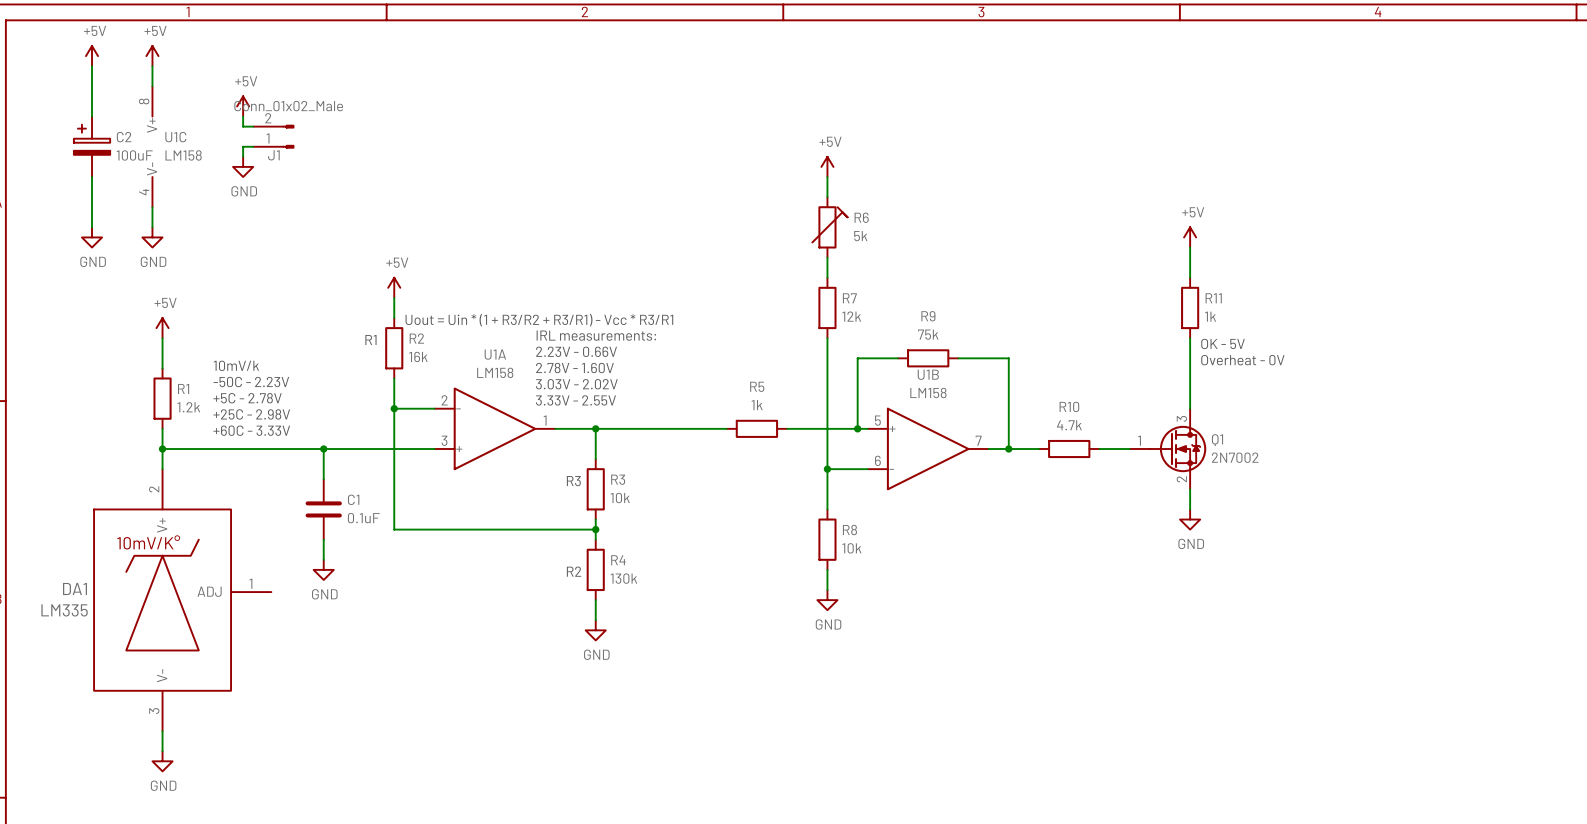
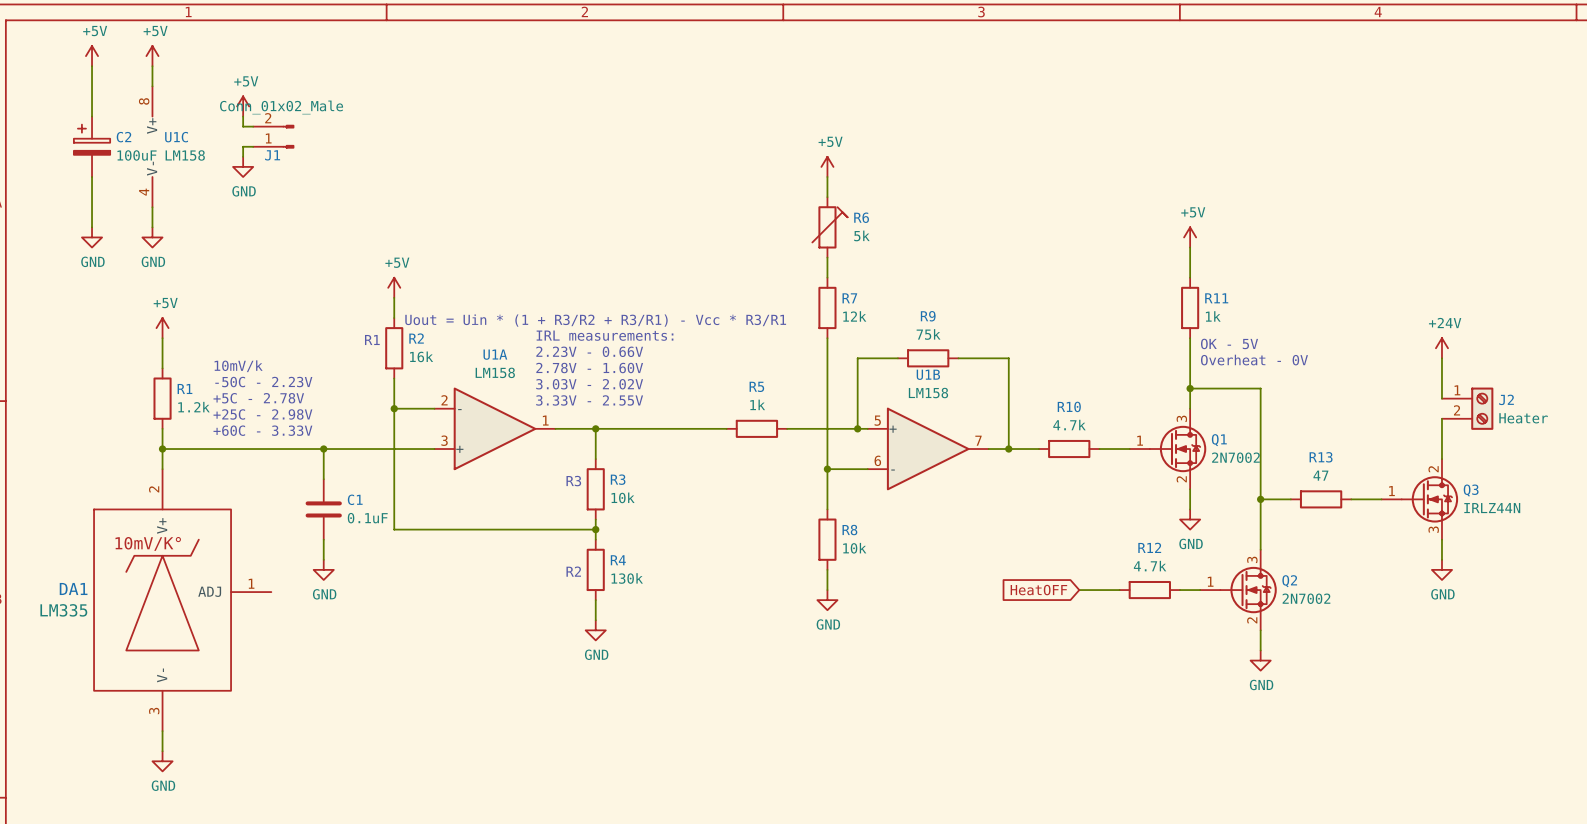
power symbol: none -> +24V (1441, 348)
wire: none -> (1441, 358) (1441, 398)
wire: none -> (1190, 388) (1260, 388) (1260, 549)
junction: none -> (1190, 388)
J2: none -> Heater (1467, 408)
wire: none -> (1441, 418) (1441, 459)
wire: none -> (1260, 499) (1290, 499)
junction: none -> (1260, 499)
R13: none -> 47 (1321, 499)
wire: none -> (1351, 499) (1381, 499)
Q3: none -> IRLZ44N (1419, 499)
wire: none -> (1441, 539) (1441, 559)
power symbol: none -> GND (1441, 569)
global label: none -> HeatOFF (1038, 590)
wire: none -> (1079, 590) (1119, 590)
R12: none -> 4.7k (1149, 590)
wire: none -> (1180, 590) (1200, 590)
Q2: none -> 2N7002 (1238, 590)
wire: none -> (1260, 630) (1260, 650)
power symbol: none -> GND (1260, 660)

